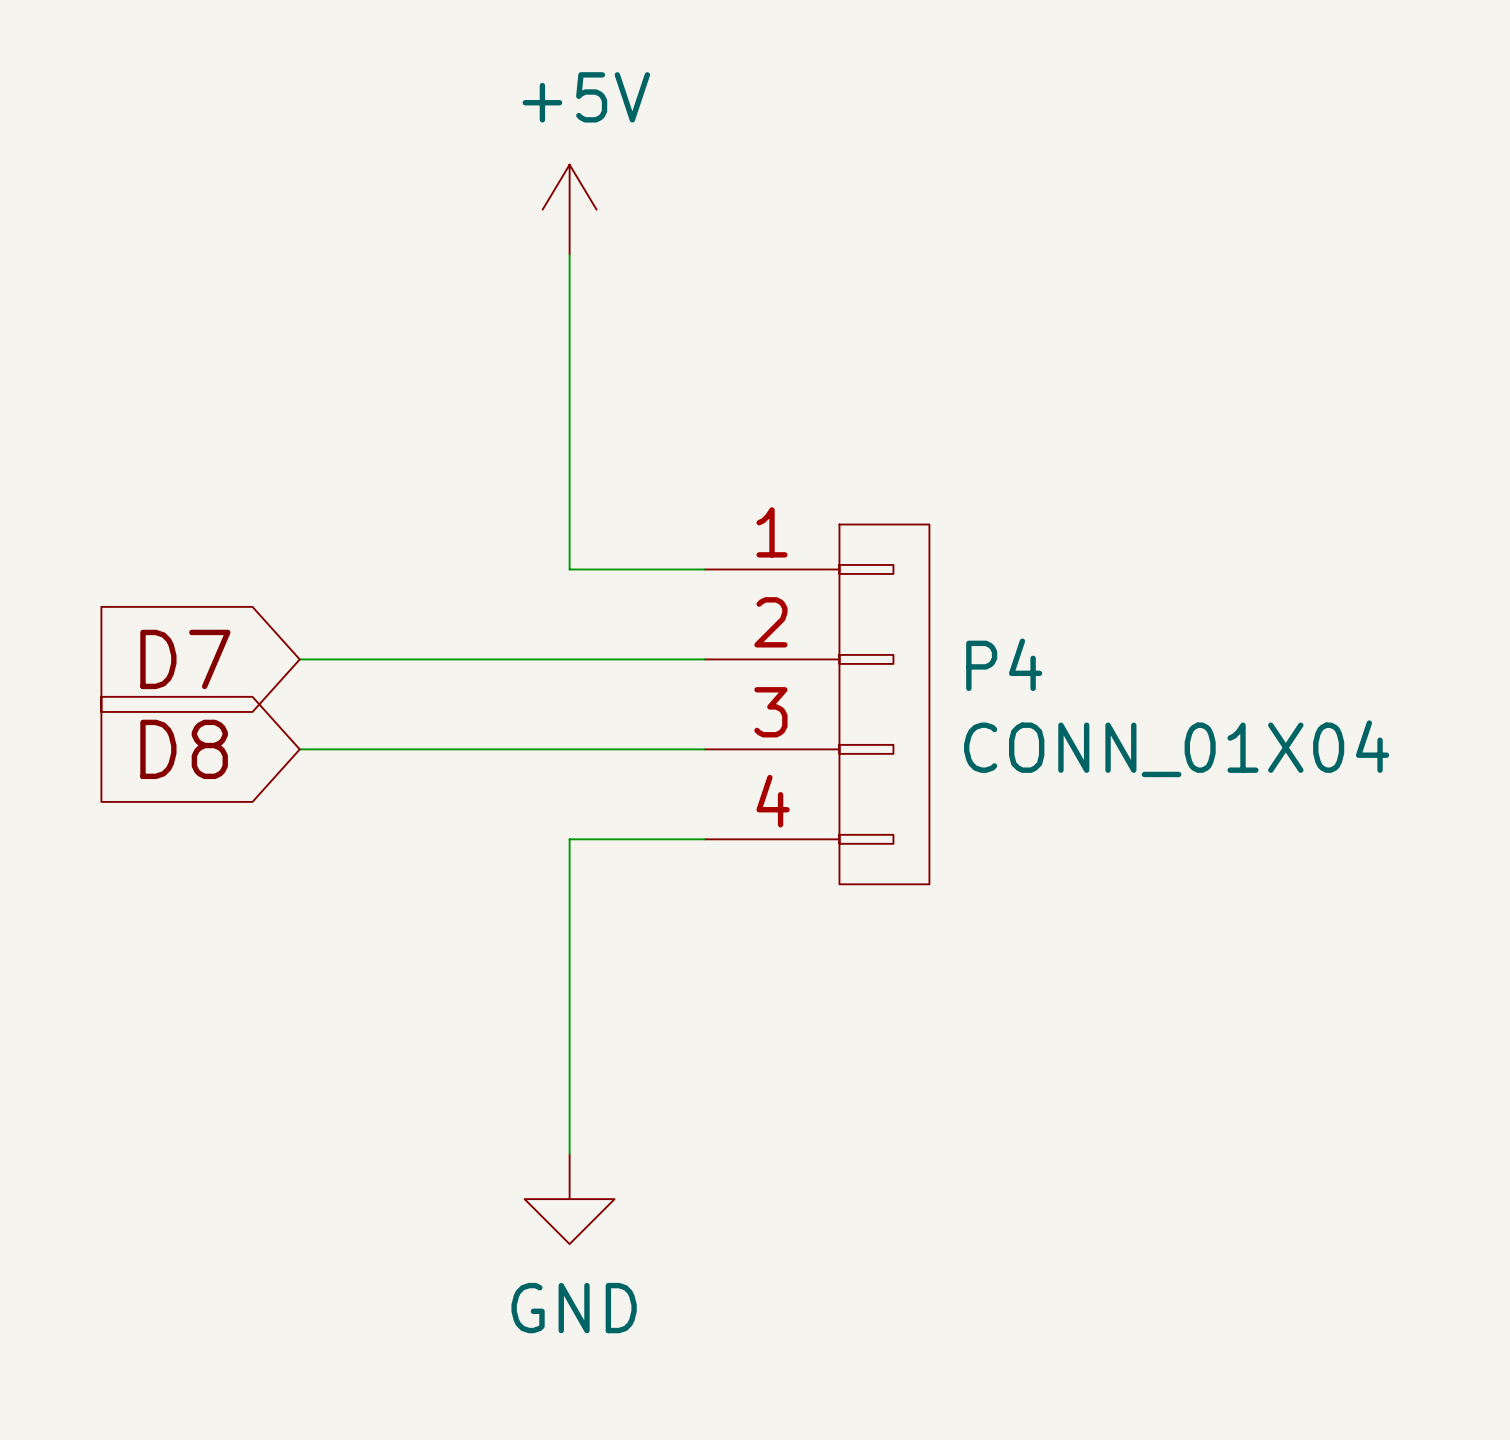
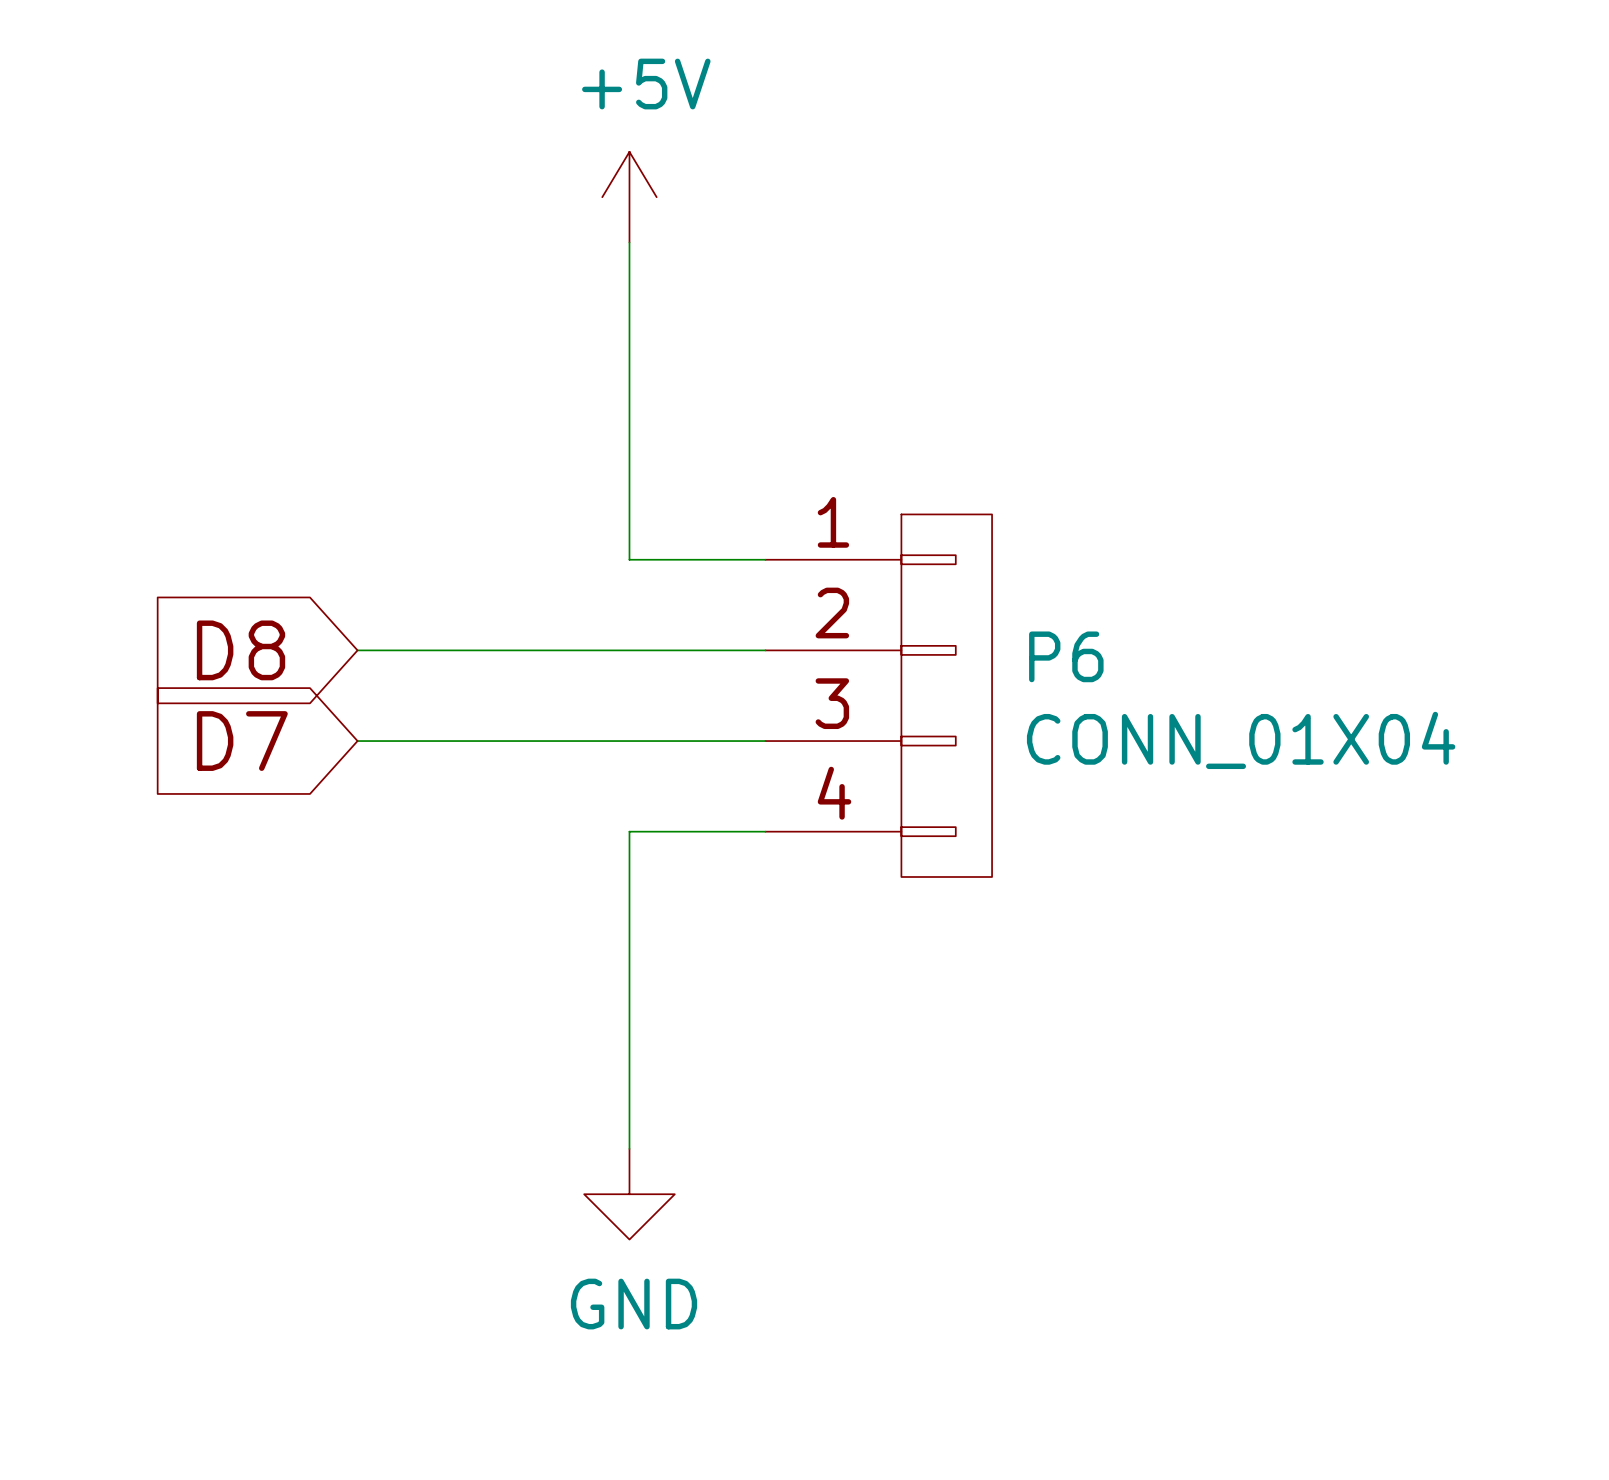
global label: D7 (185, 659) -> D8 (241, 650)
P4 name: P4 (1004, 664) -> P6 (1066, 656)
global label: D8 (184, 749) -> D7 (242, 741)

